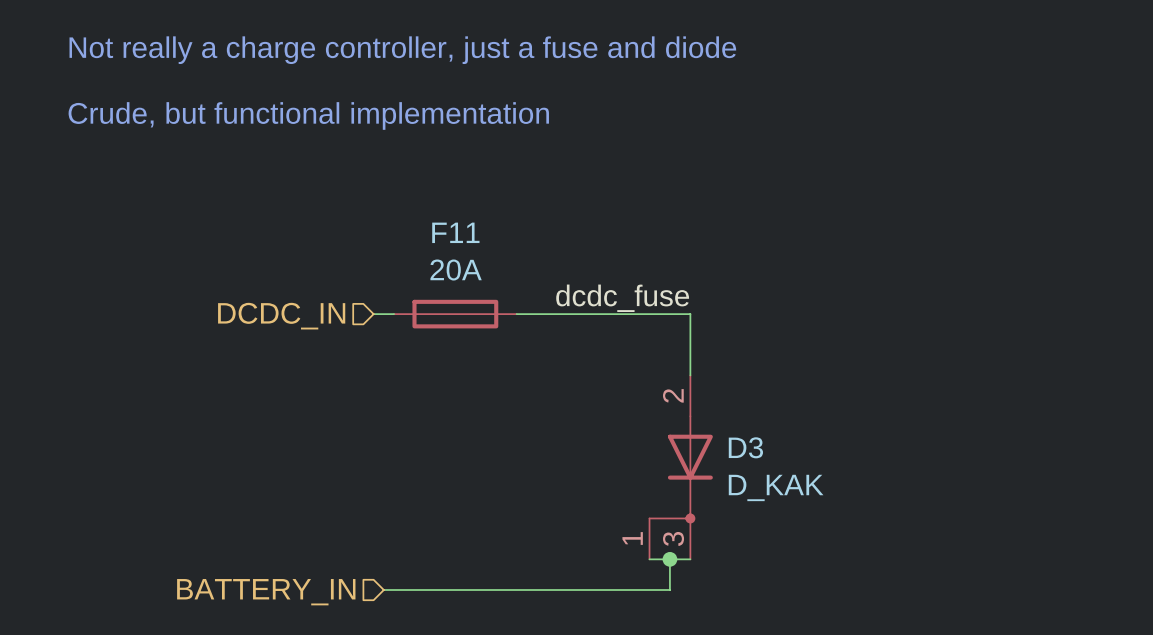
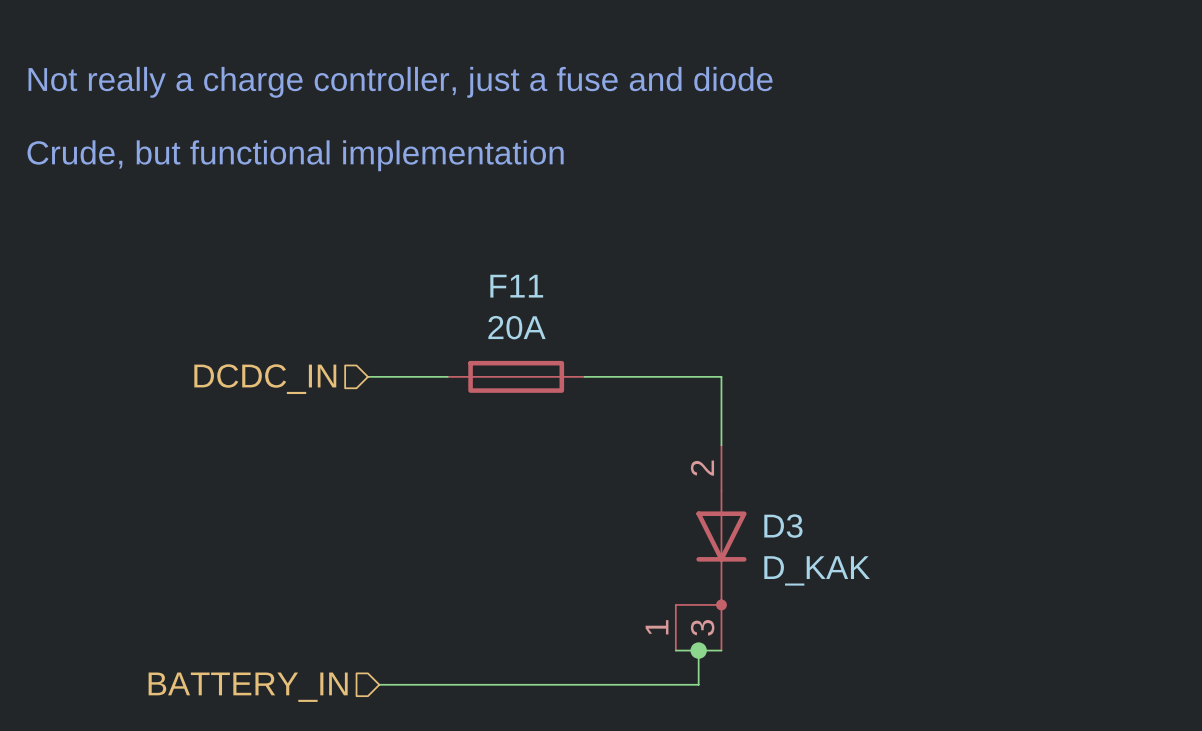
label: dcdc_fuse (622, 298) -> none
F11 position: (455, 314) -> (516, 376)

